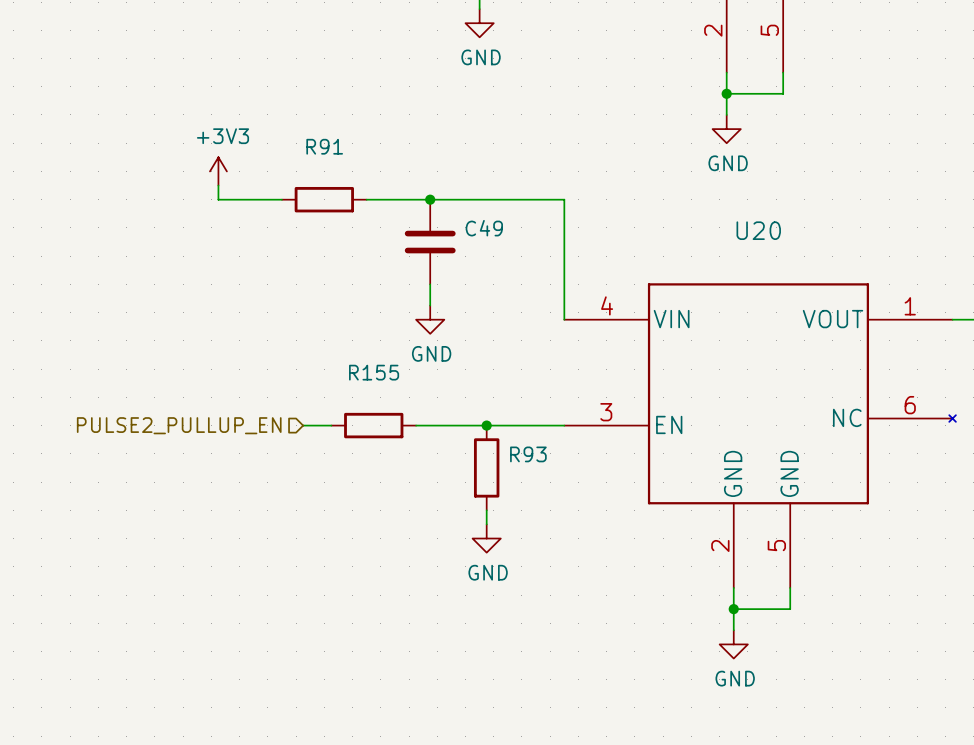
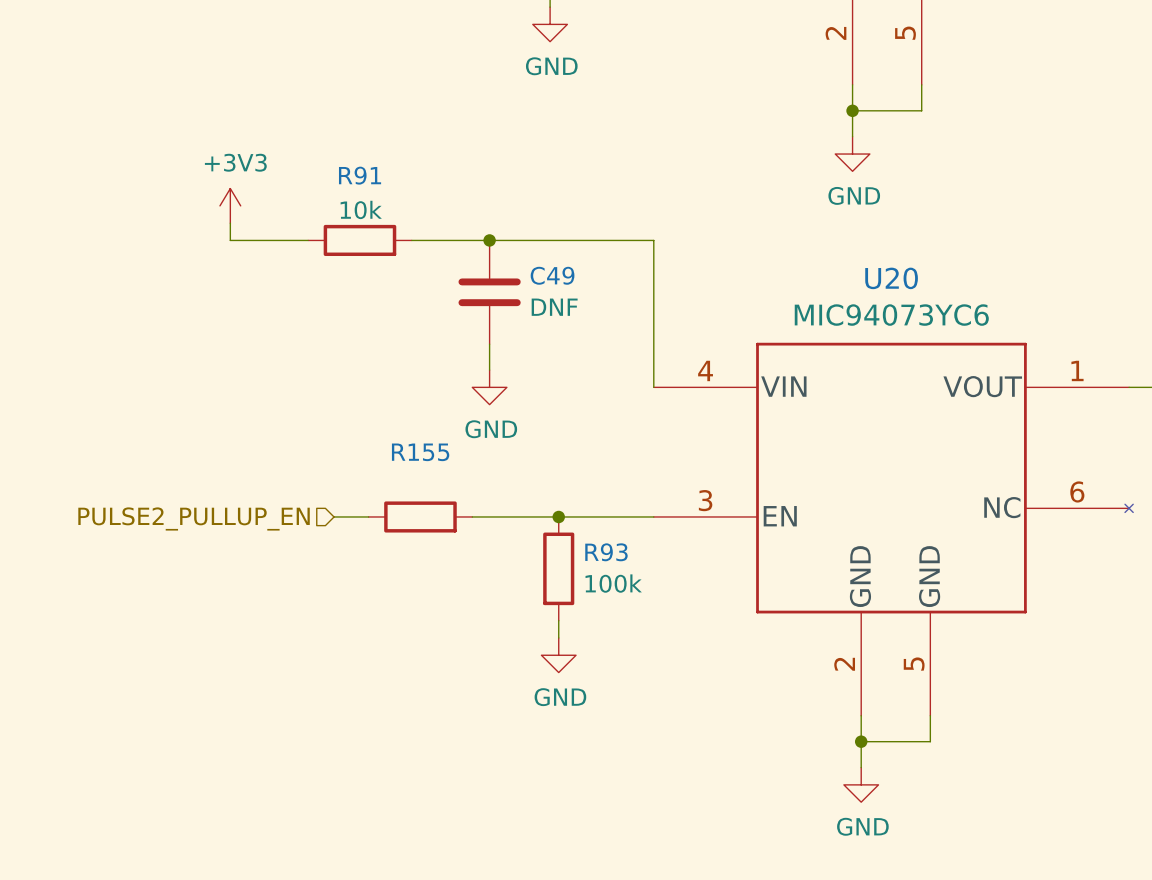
R91 value: none -> 10k (361, 209)
C49 value: none -> DNF (554, 307)
U20 value: none -> MIC94073YC6 (891, 315)
R93 value: none -> 100k (613, 583)

